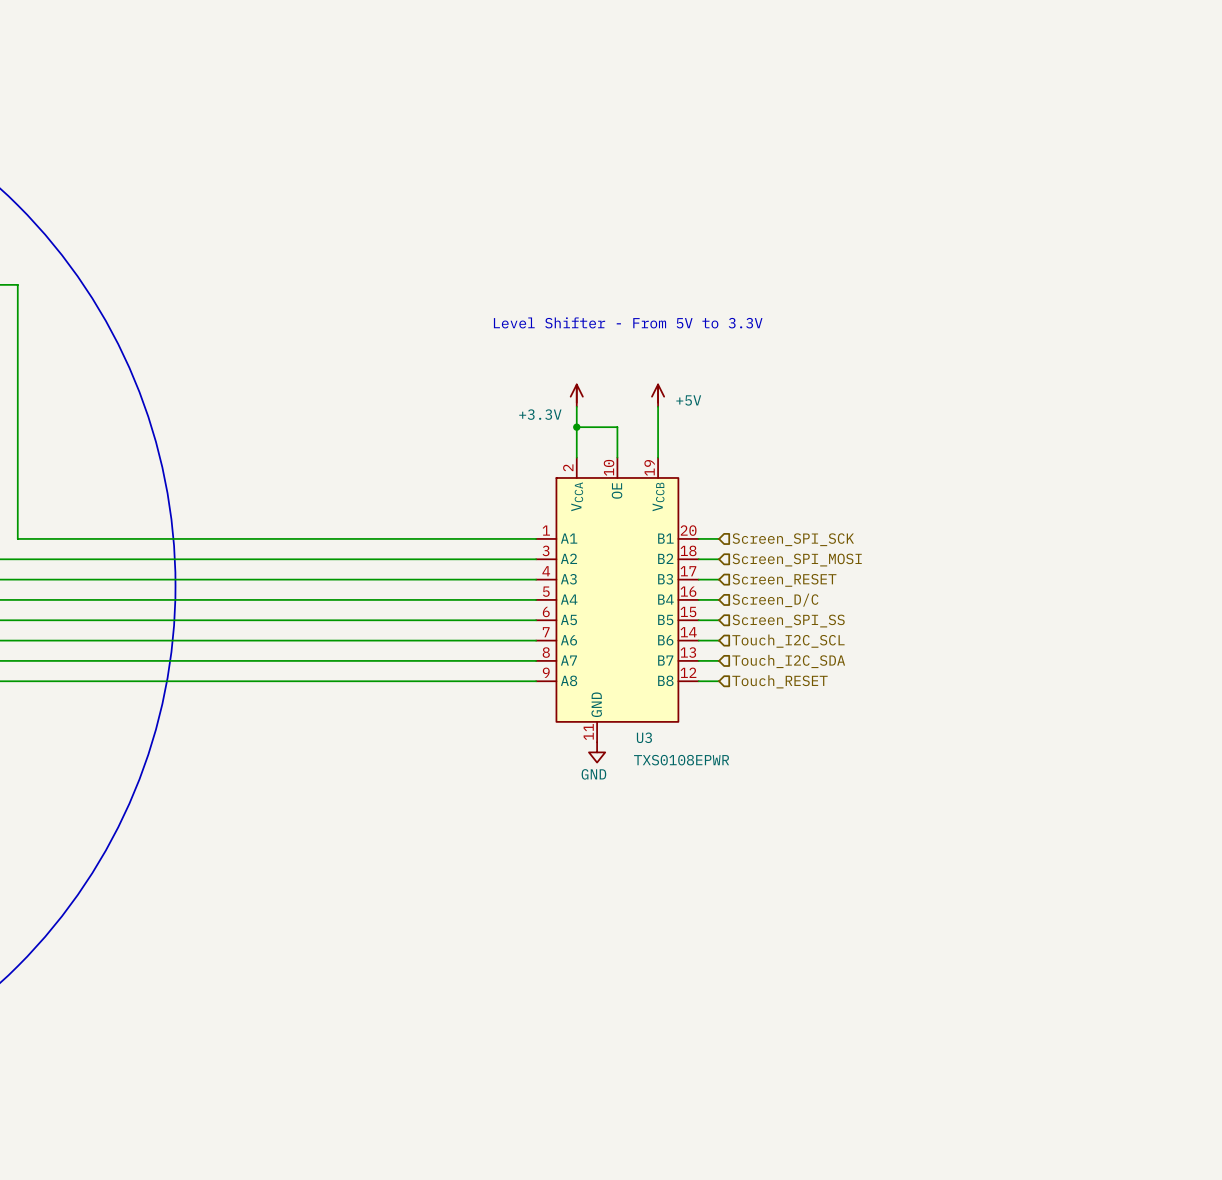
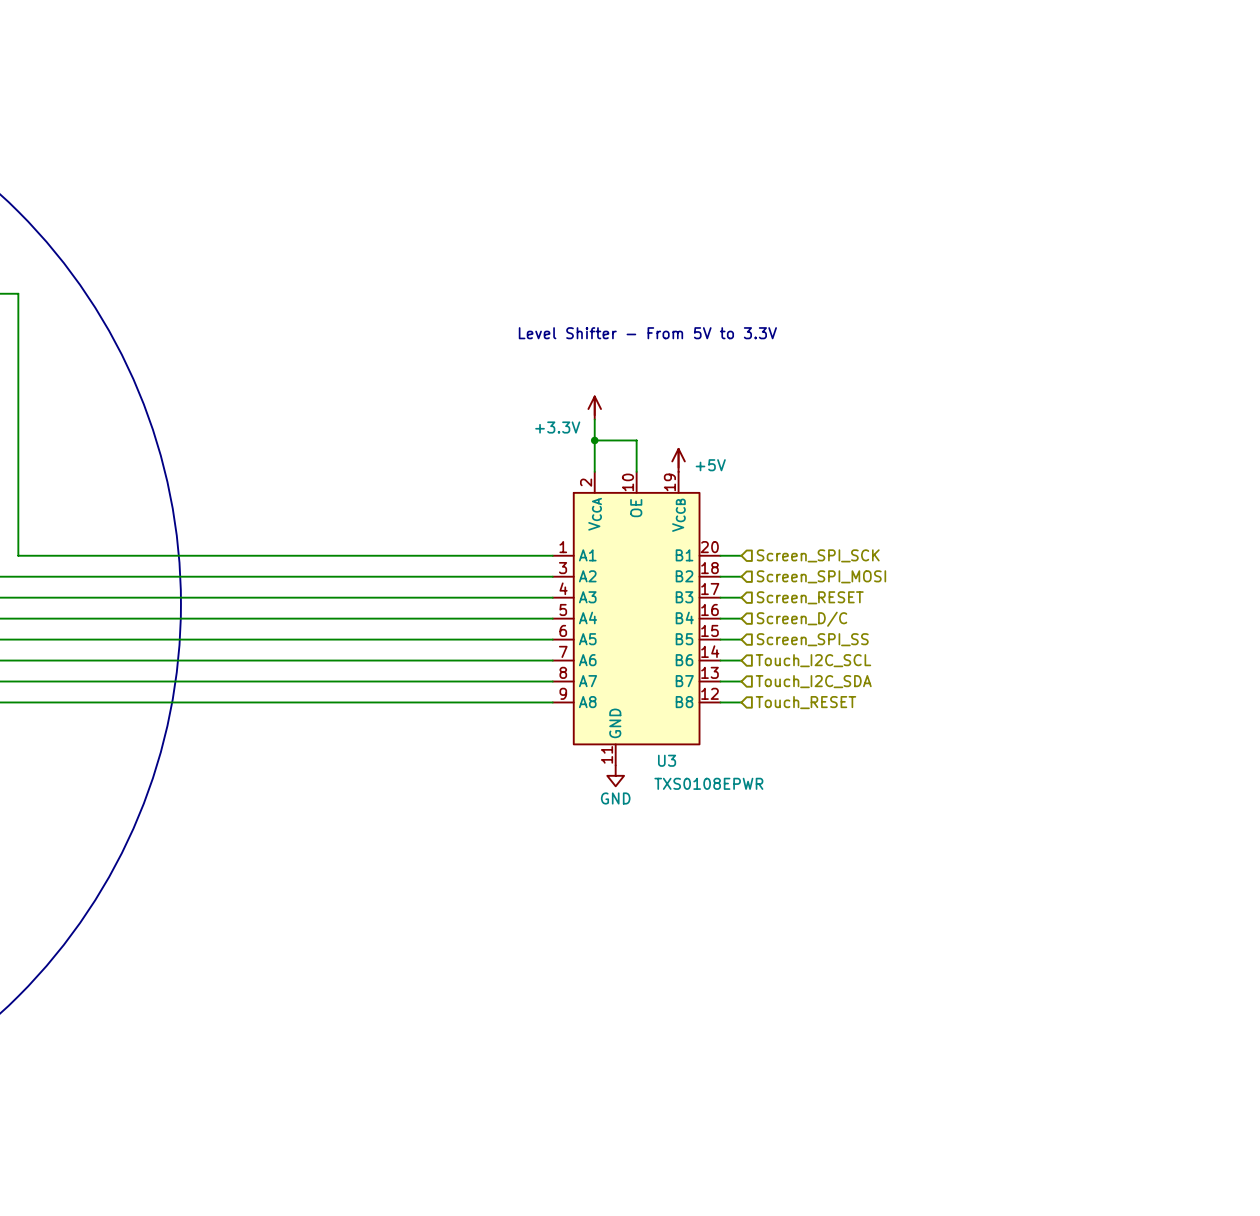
power symbol position: +5V (658, 395) -> +5V (678, 460)
wire: (658, 406) (658, 457) -> none

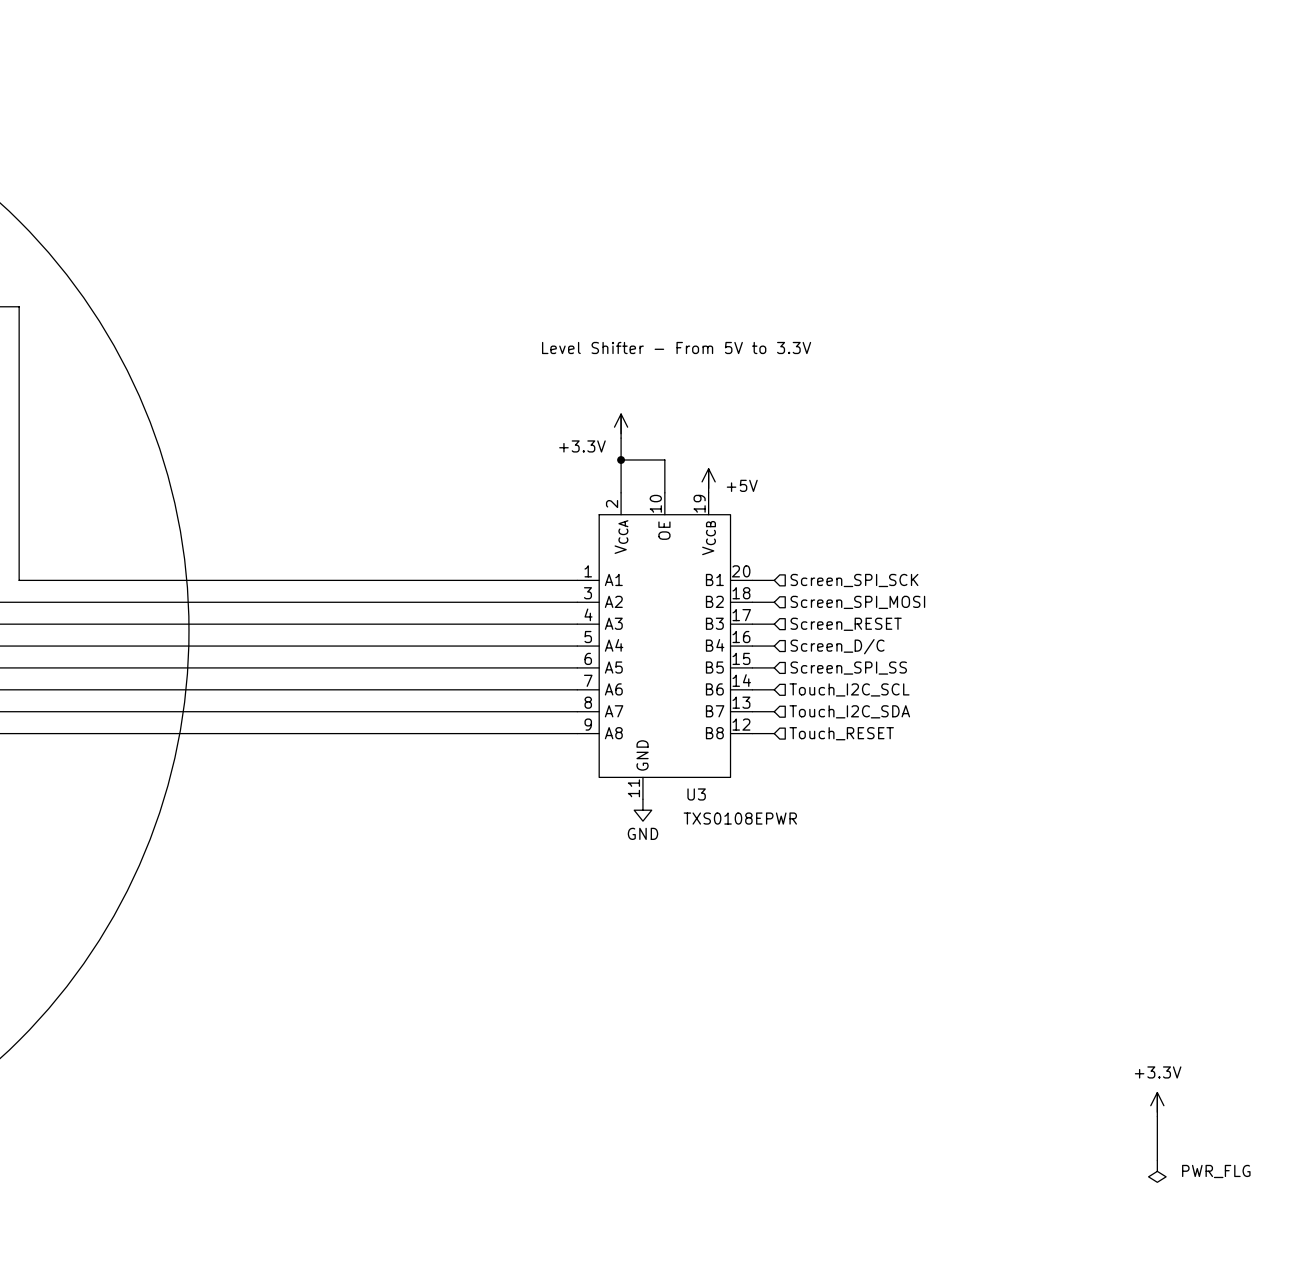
power symbol: none -> +3.3V (1157, 1104)
wire: none -> (1157, 1116) (1157, 1160)
power symbol: none -> PWR_FLG (1157, 1171)

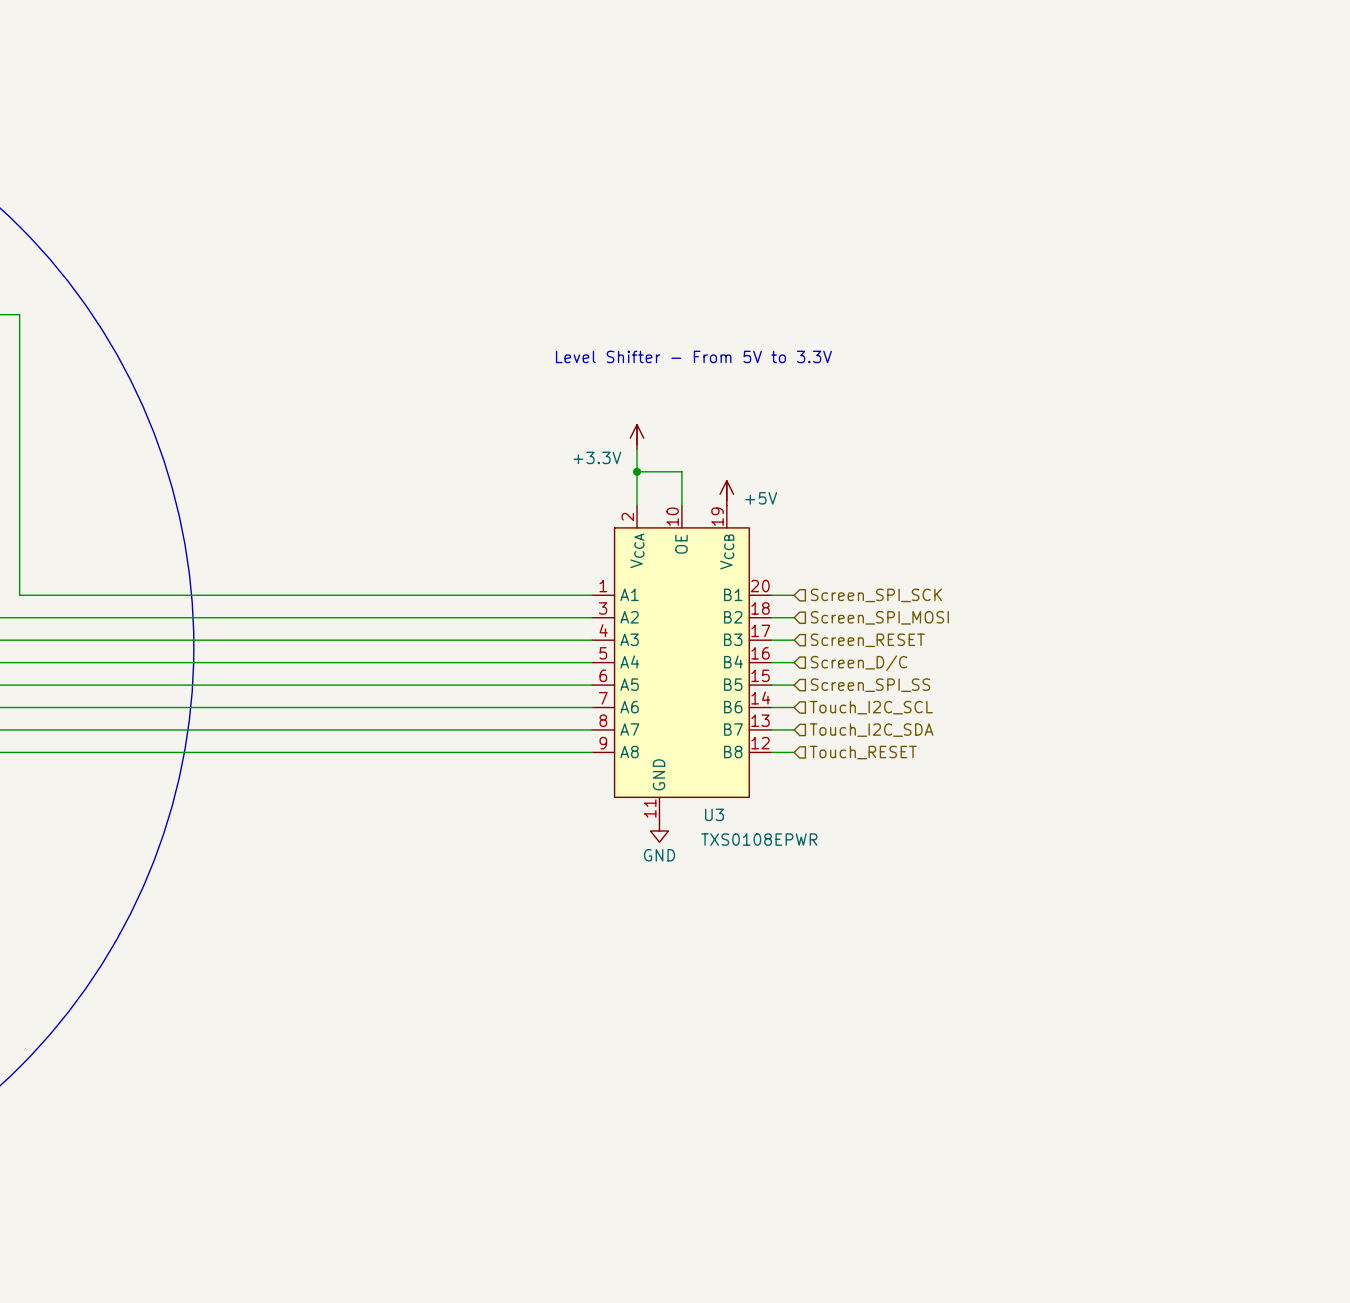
power symbol: +3.3V (1157, 1104) -> none
wire: (1157, 1116) (1157, 1160) -> none
power symbol: PWR_FLG (1157, 1171) -> none

